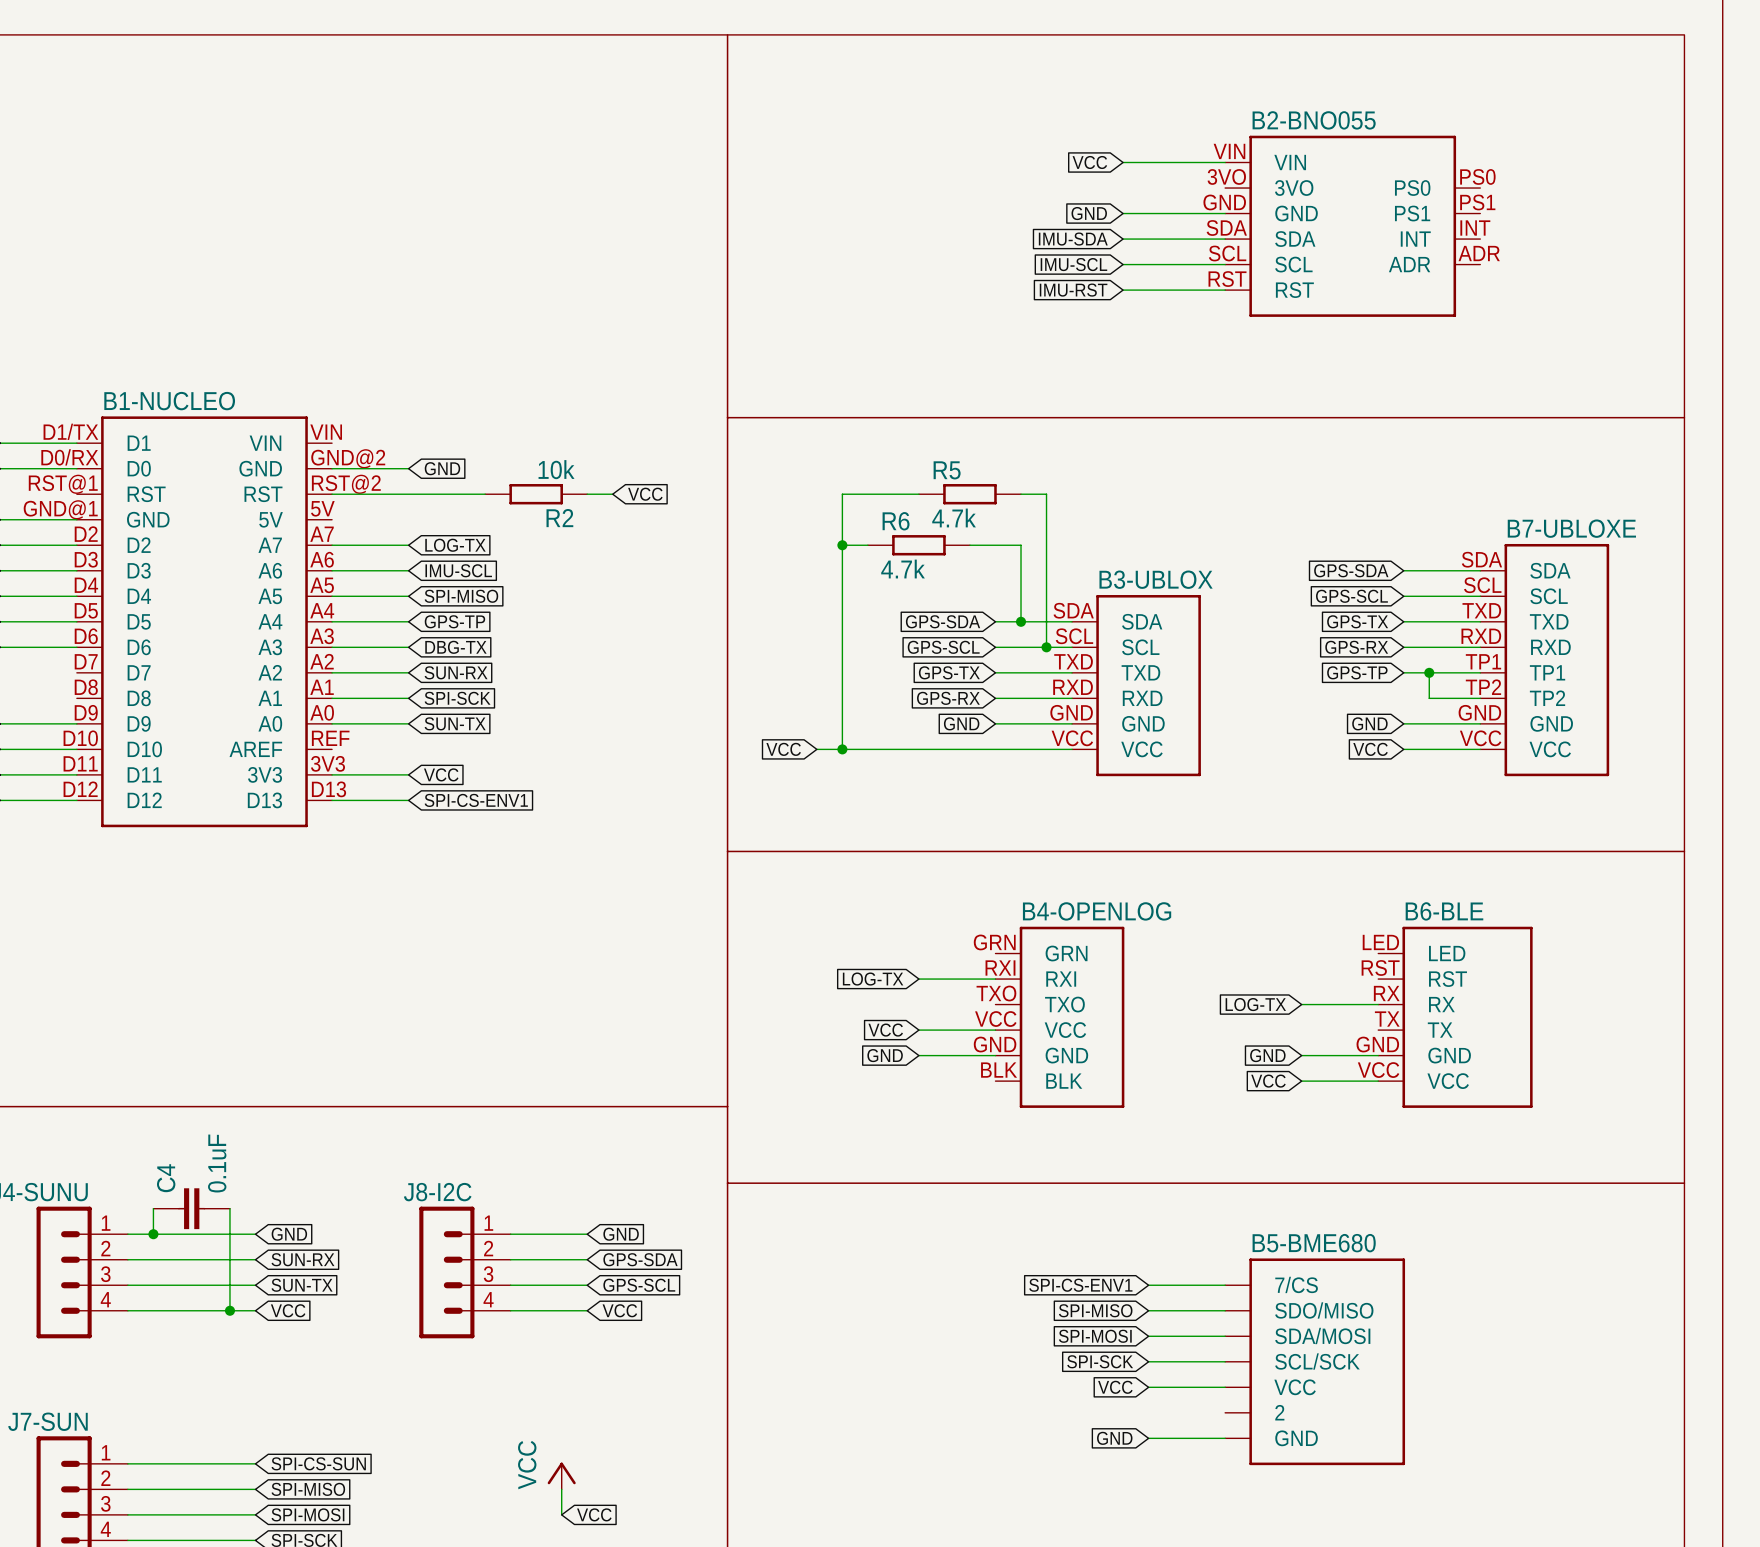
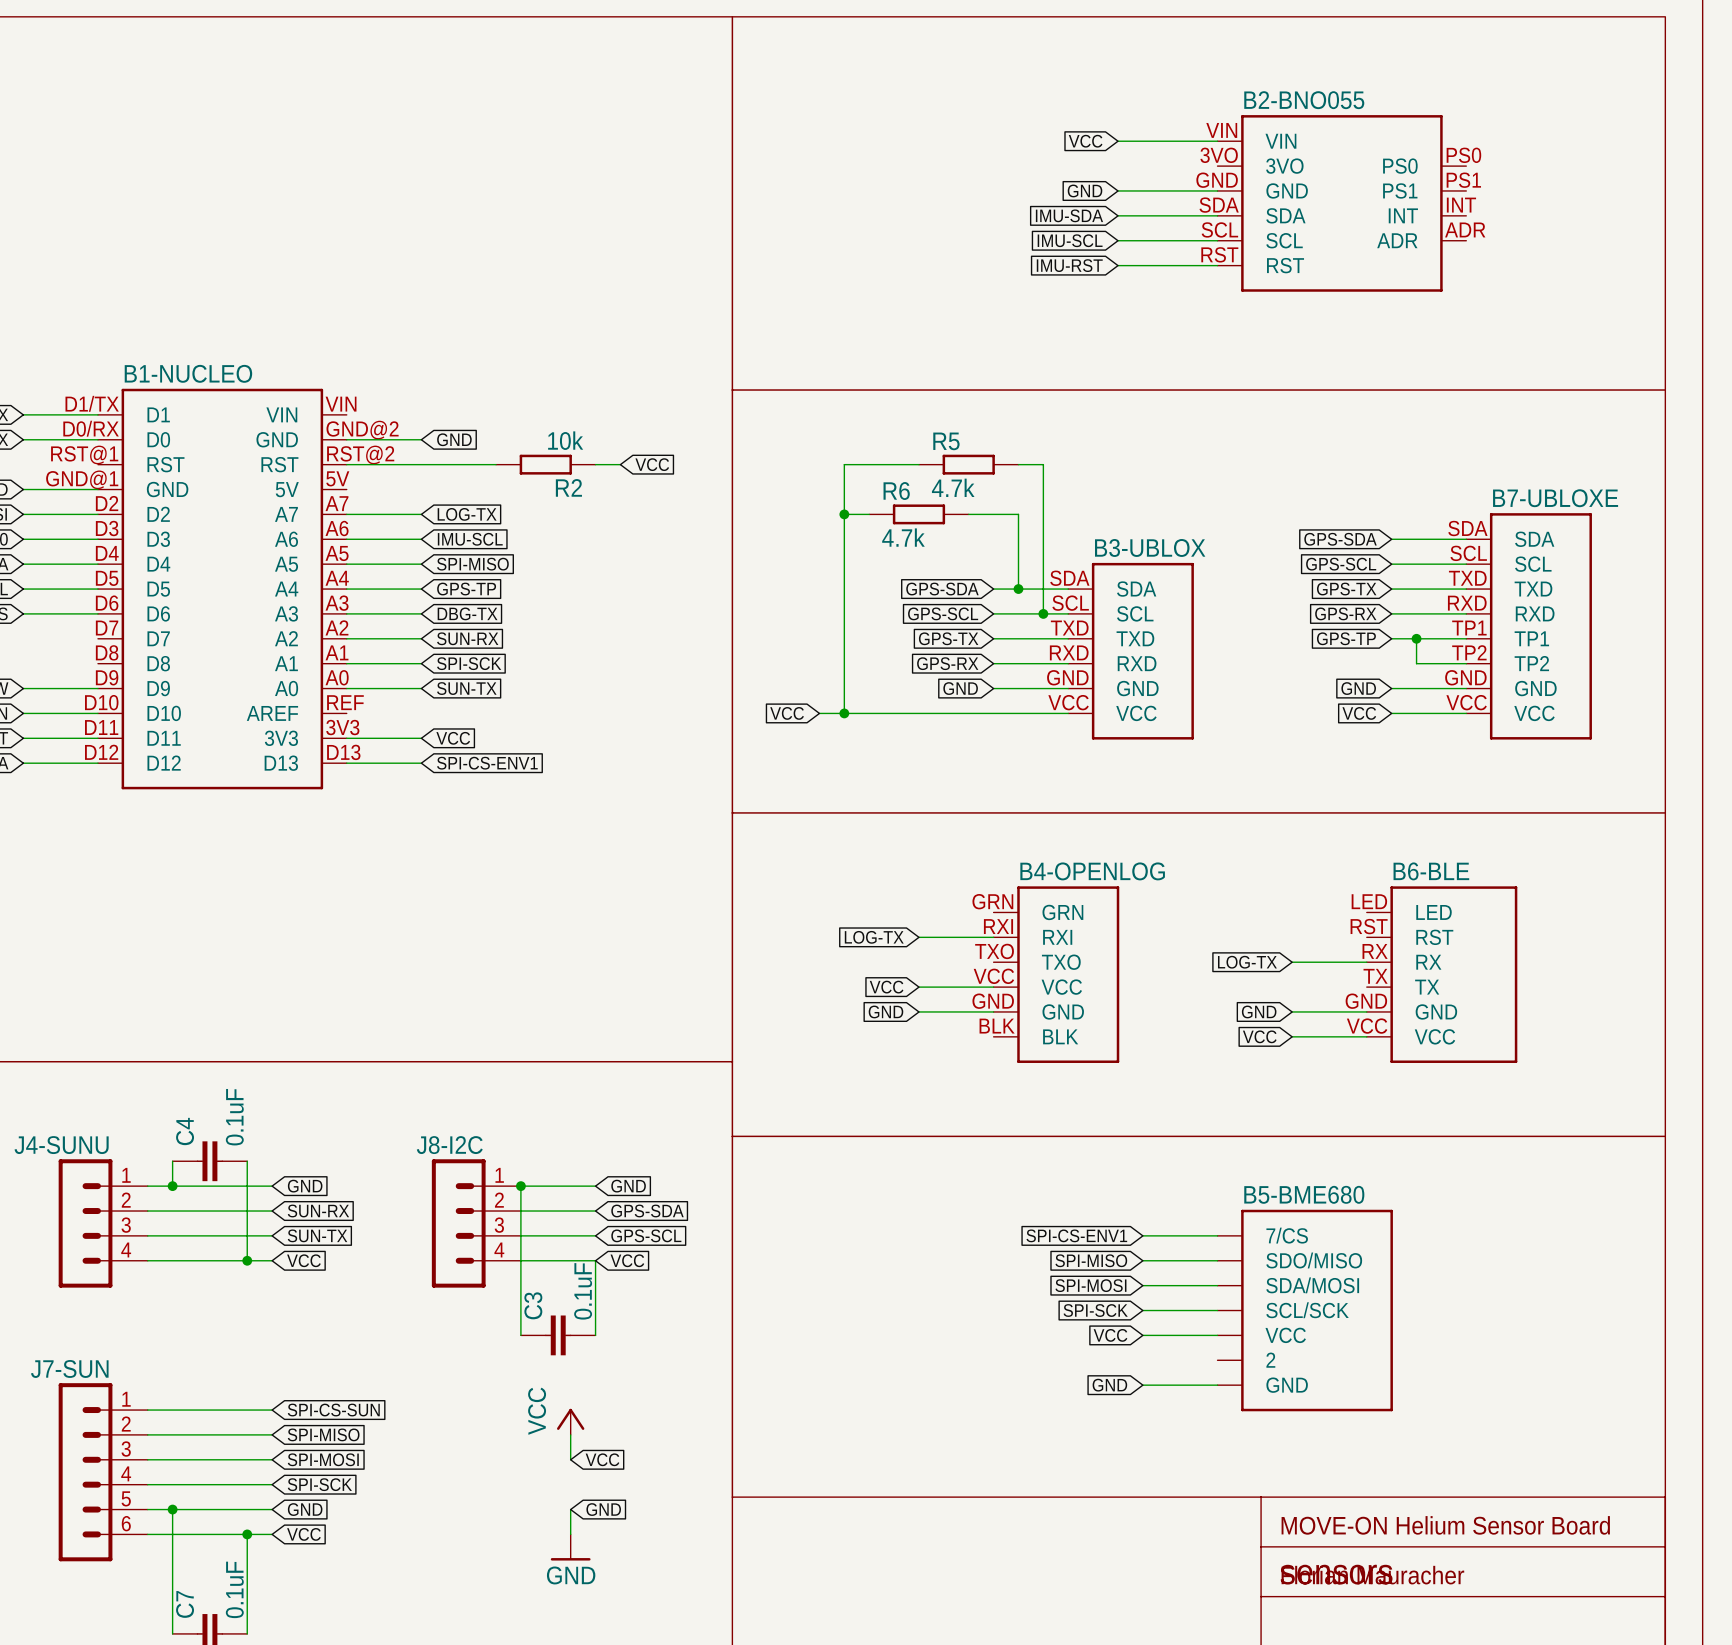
wire: none -> (520, 1186) (520, 1335)
junction: none -> (520, 1186)
wire: none -> (595, 1260) (595, 1335)
C3: none -> 0.1uF (558, 1335)

